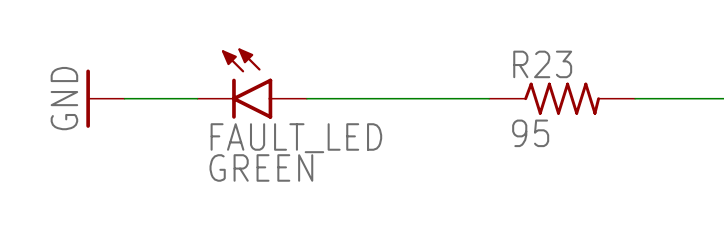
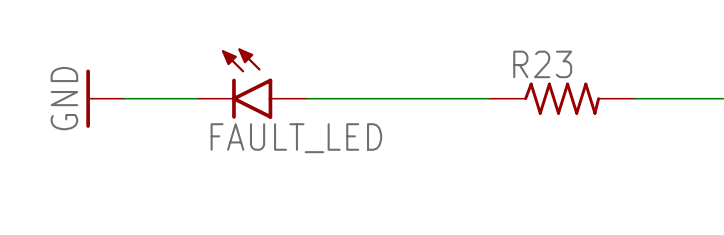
R23 value: 95 (530, 133) -> none
FAULT_LED value: GREEN (261, 167) -> none

